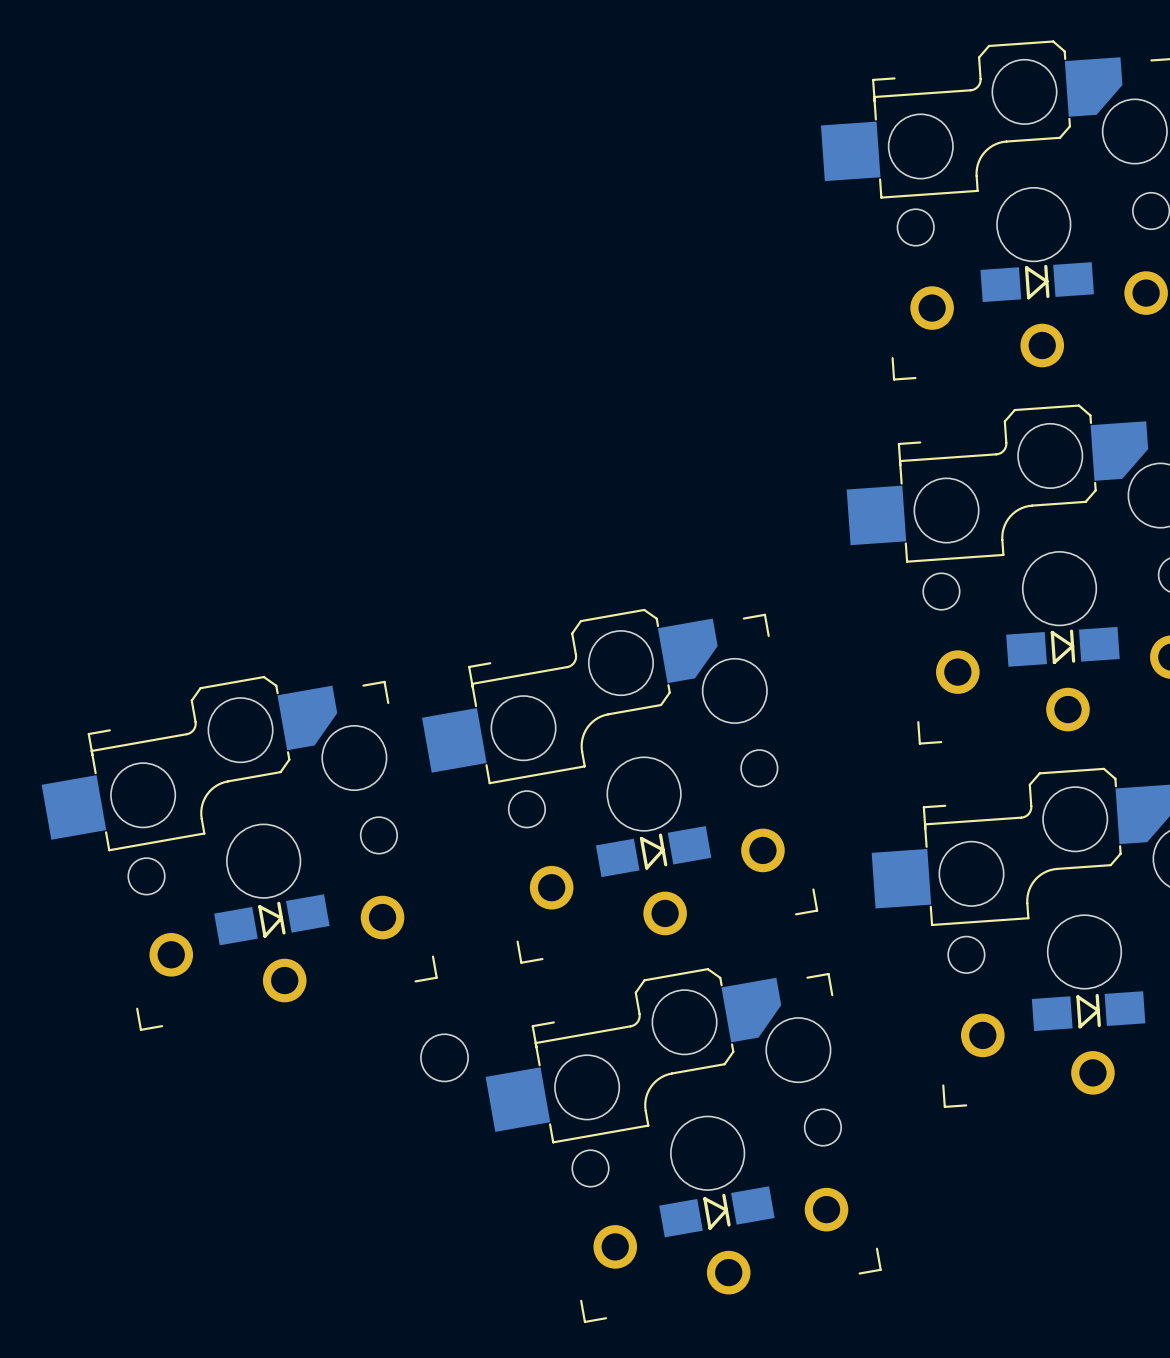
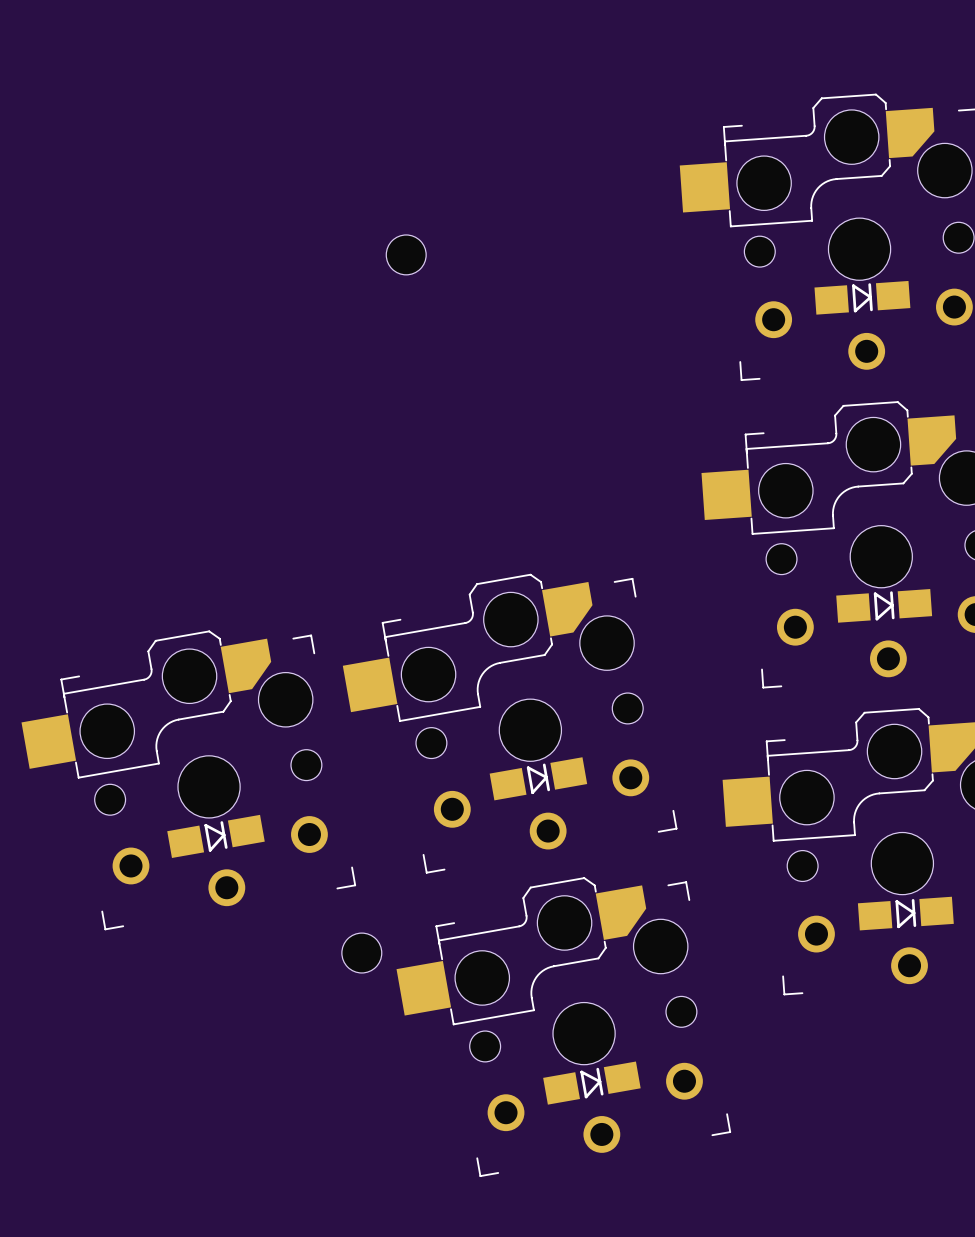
part: none -> (406, 254)

